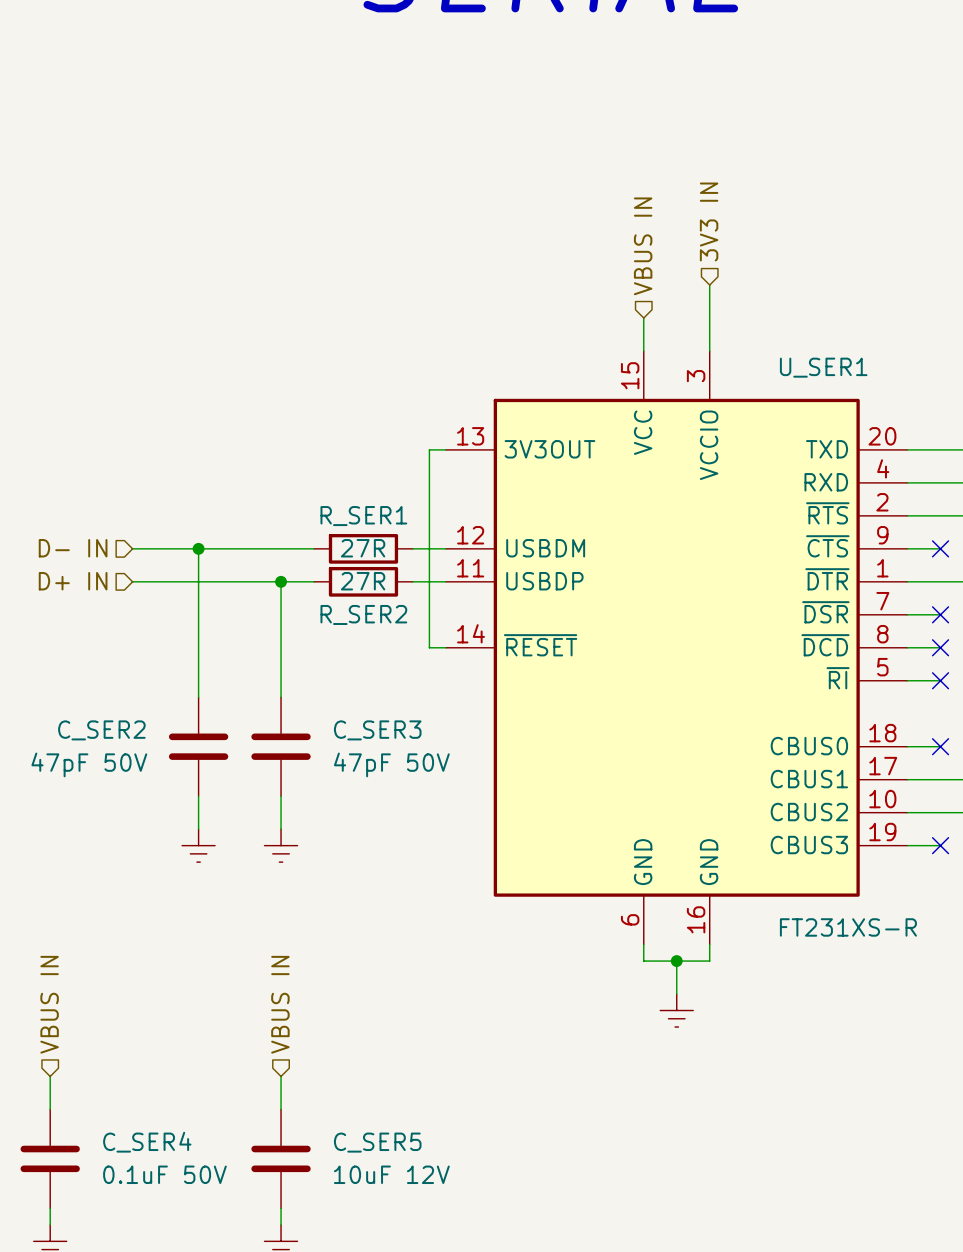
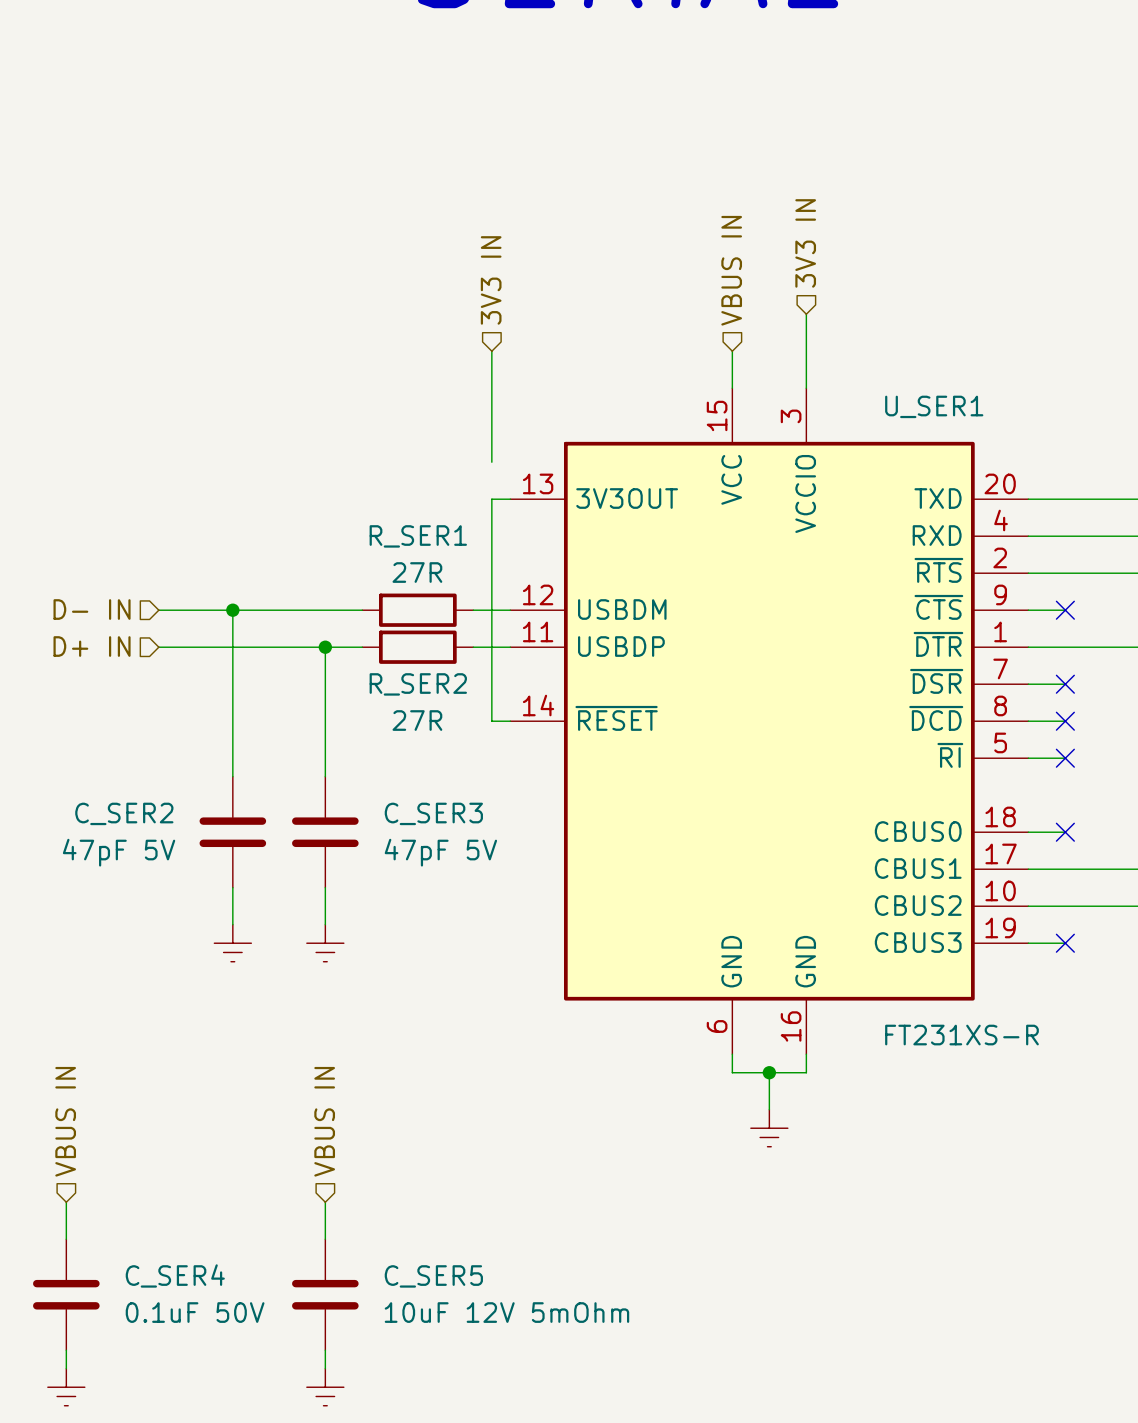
hierarchical label: none -> 3V3 IN (491, 280)
wire: none -> (491, 351) (491, 462)
R_SER1 name position: R_SER1 (363, 516) -> R_SER1 (418, 536)
R_SER1 value position: 27R (363, 548) -> 27R (417, 572)
R_SER2 value position: 27R (363, 581) -> 27R (417, 720)
C_SER2 value: 47pF 50V (89, 764) -> 47pF 5V (119, 852)
C_SER3 value: 47pF 50V (391, 764) -> 47pF 5V (440, 852)
C_SER5 value: 10uF 12V (391, 1174) -> 10uF 12V 5mOhm (506, 1312)

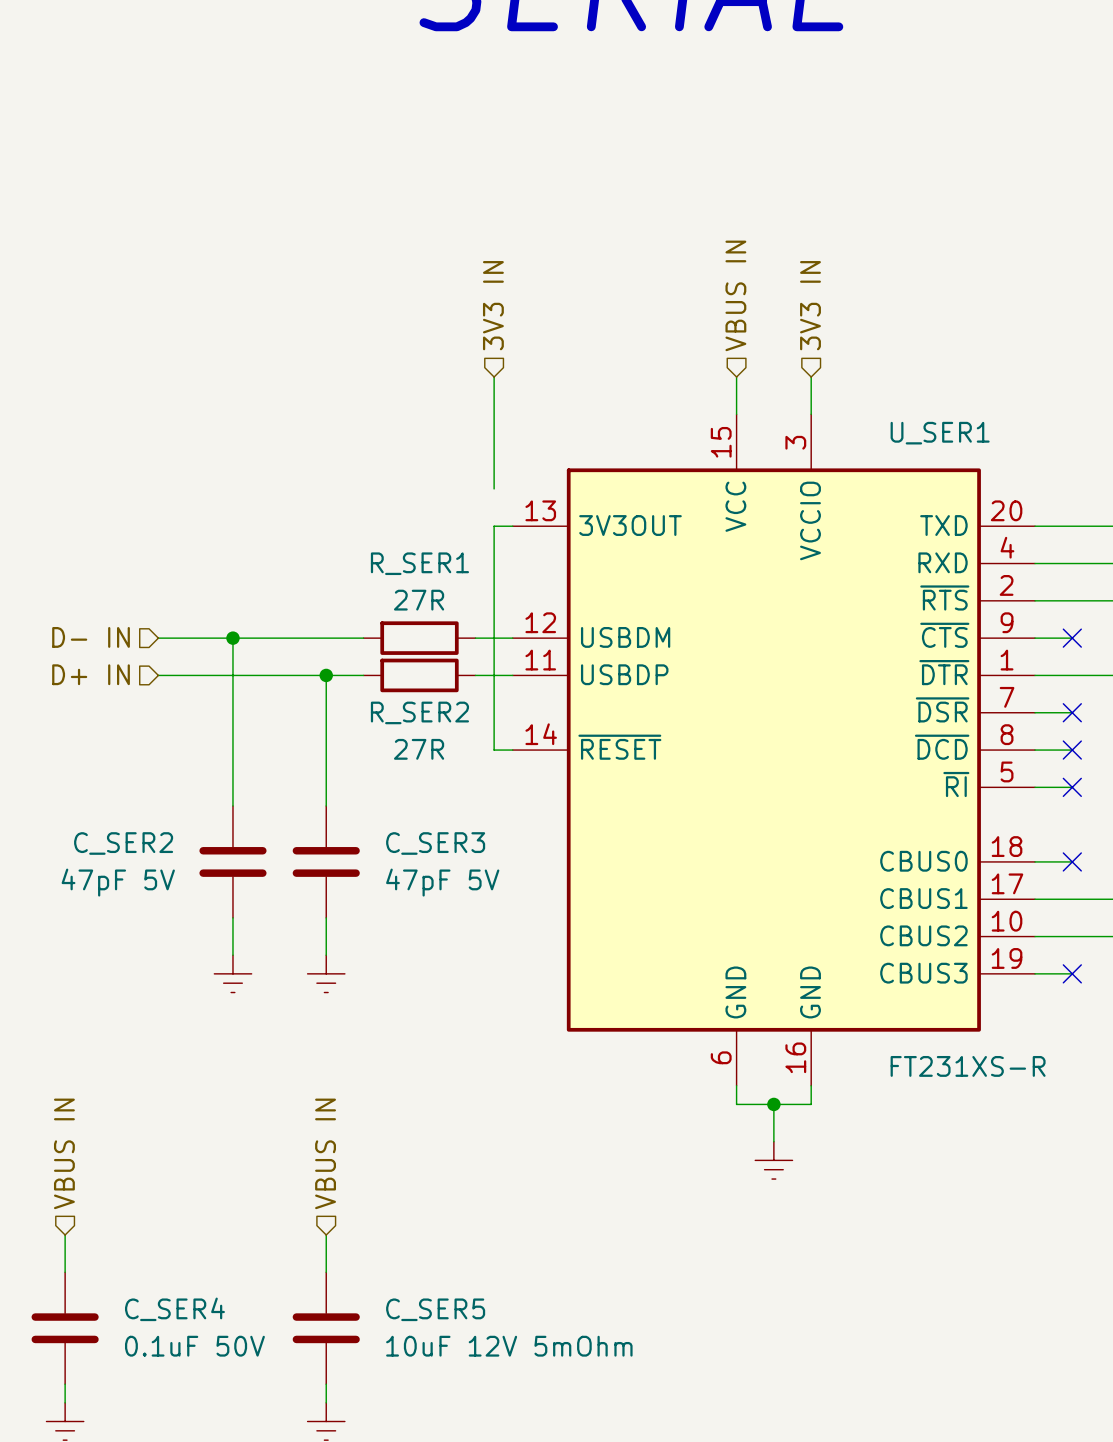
hierarchical label position: 3V3 IN (805, 243) -> 3V3 IN (810, 305)
wire: (806, 314) (806, 351) -> none

